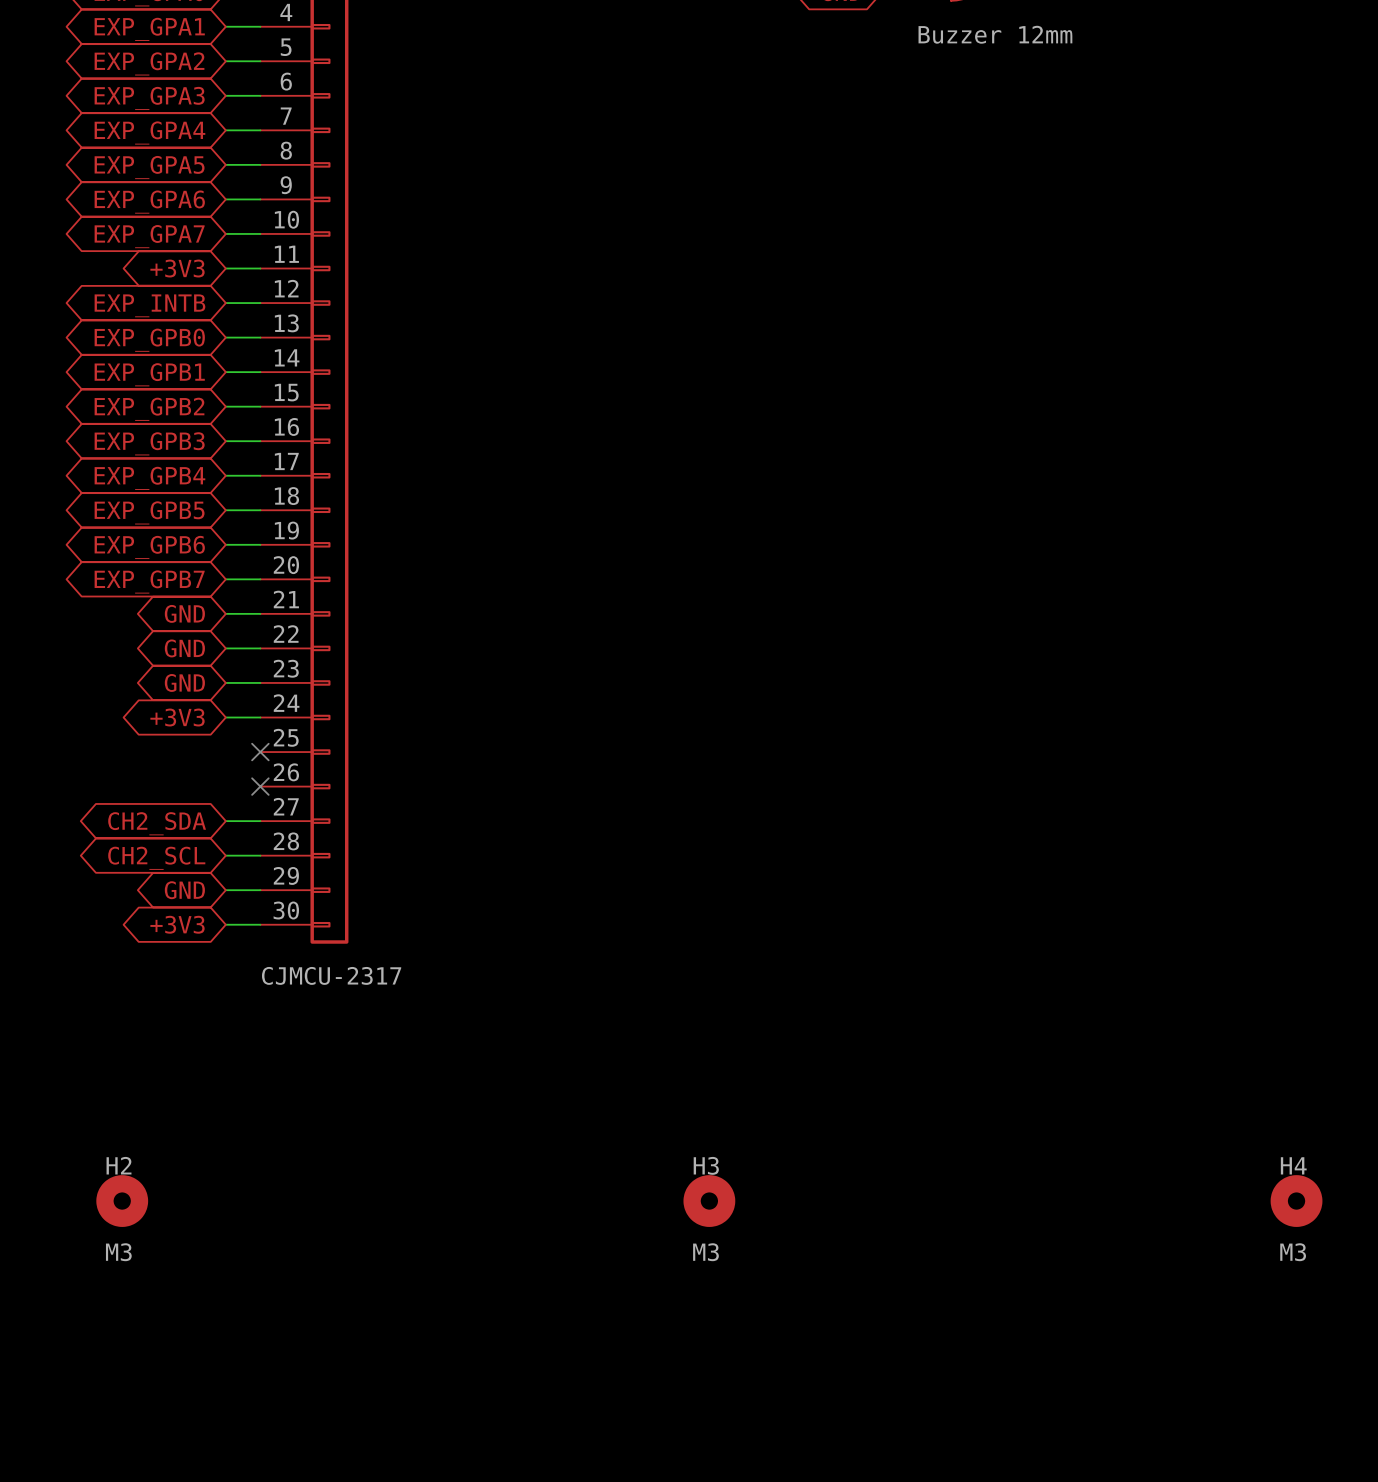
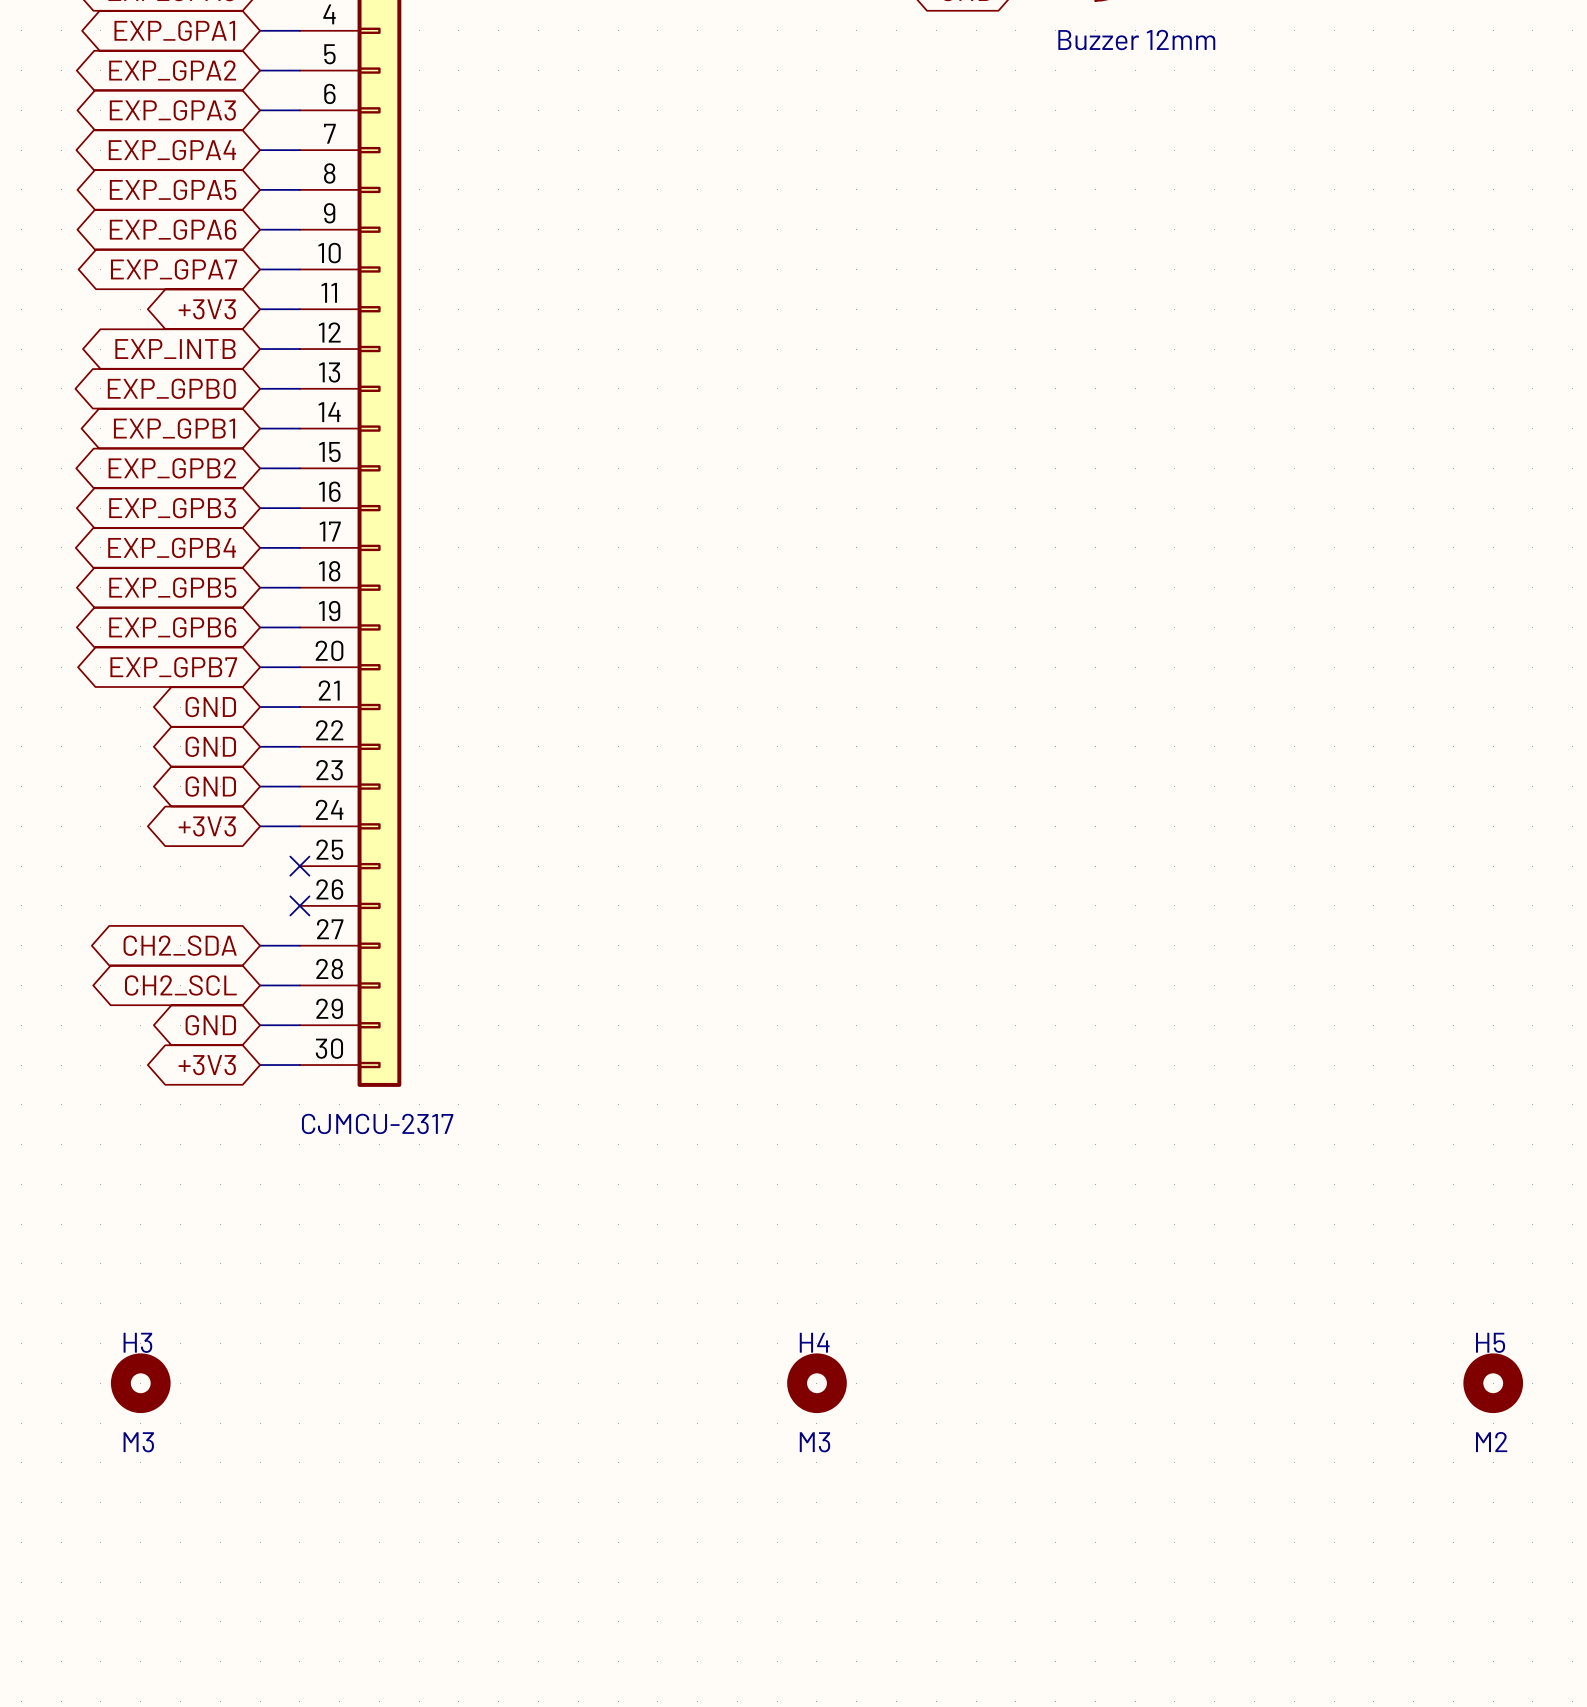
H2 name: H2 (119, 1165) -> H3 (137, 1342)
H3 name: H3 (706, 1165) -> H4 (814, 1342)
H4 name: H4 (1293, 1165) -> H5 (1490, 1342)
H4 value: M3 (1293, 1252) -> M2 (1491, 1442)

